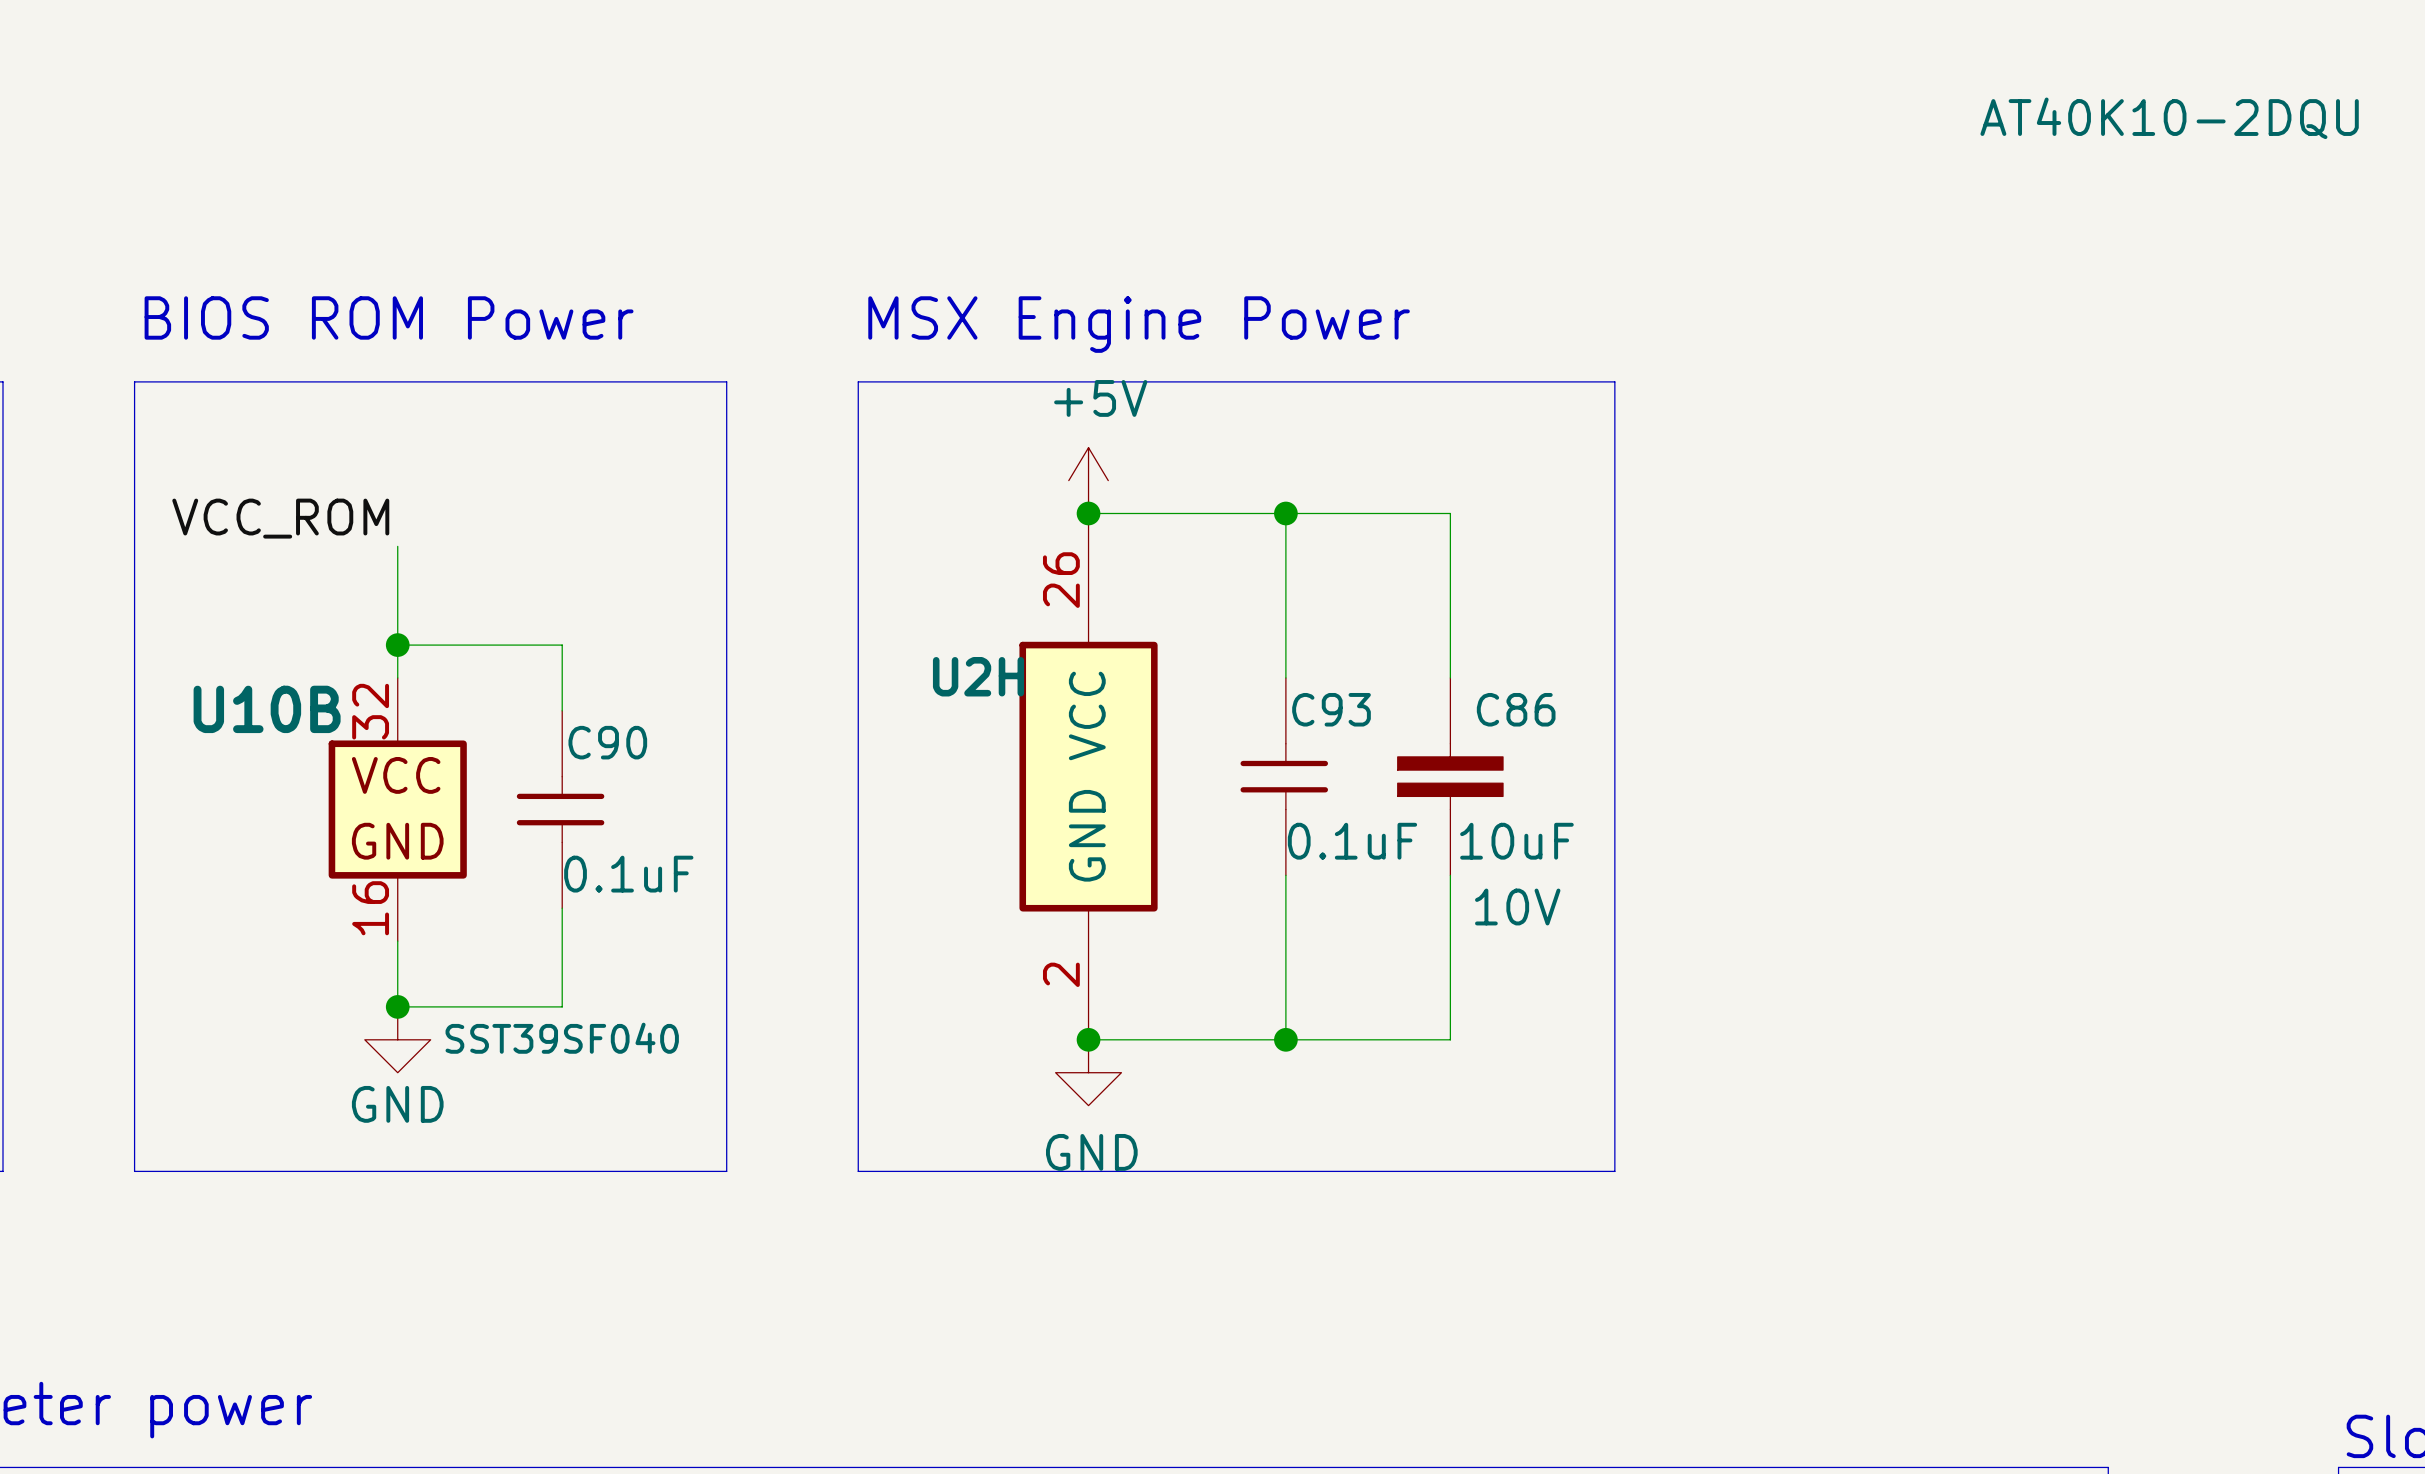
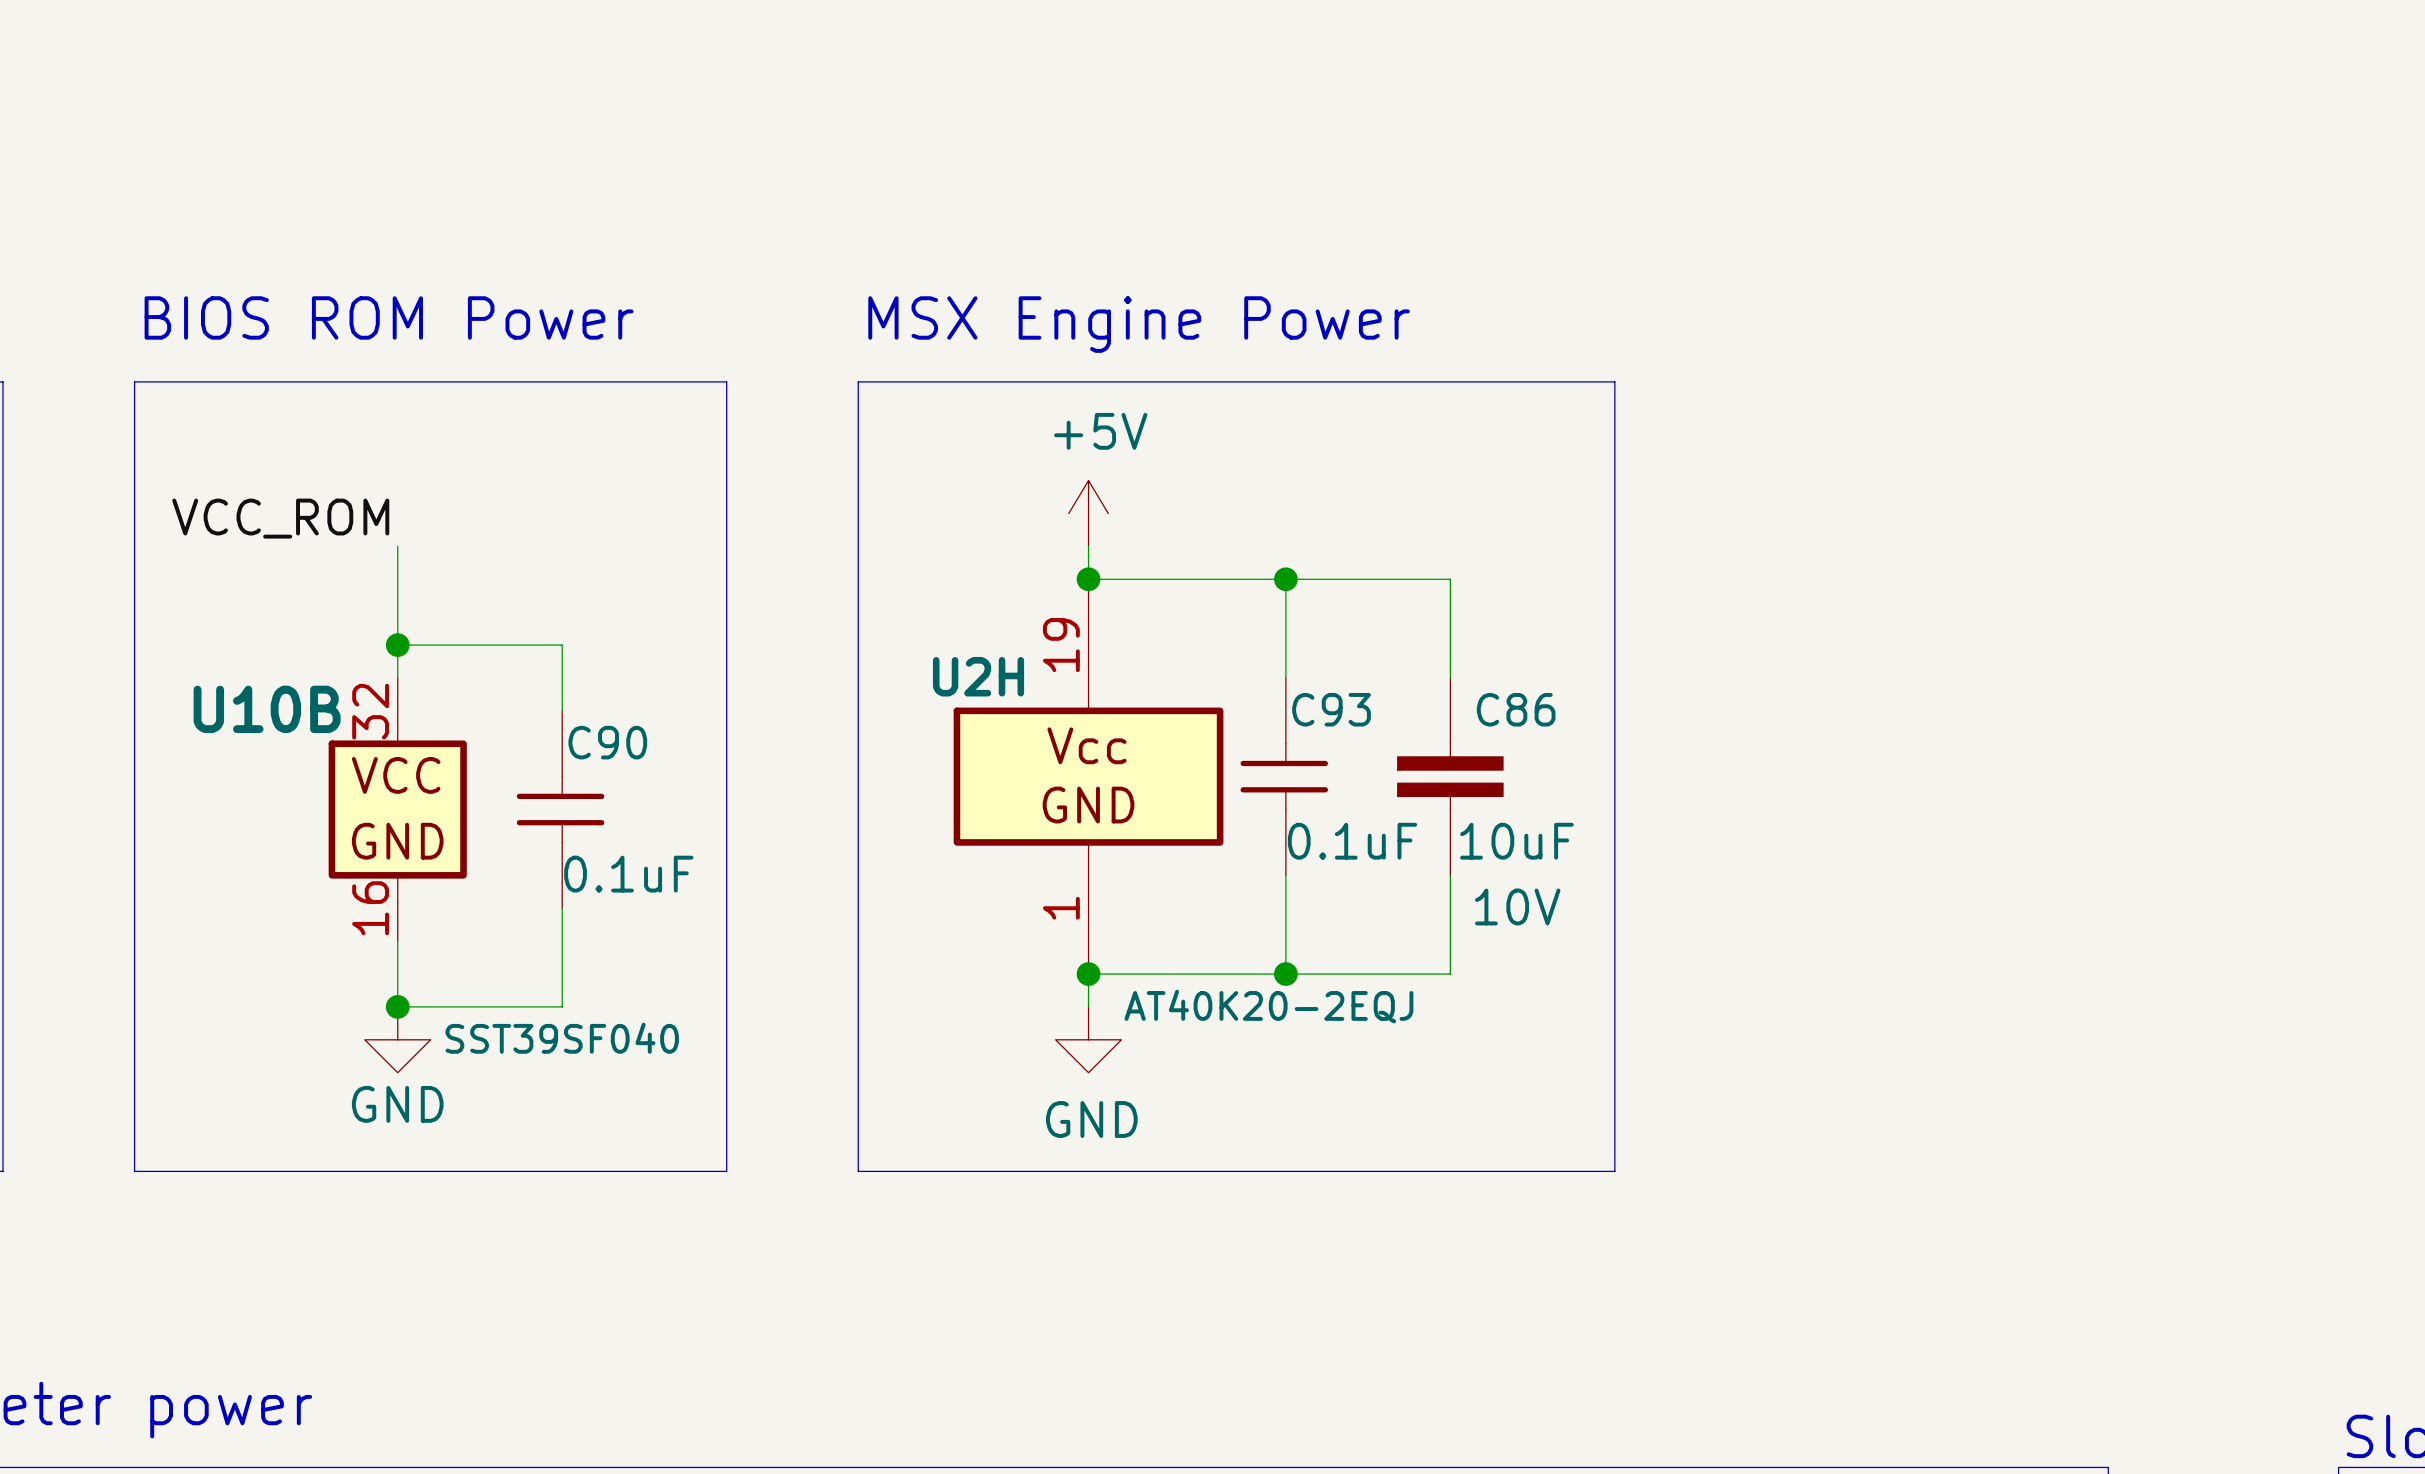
U2H value: AT40K10-2DQU (2169, 118) -> AT40K20-2EQJ (1268, 1006)
power symbol position: +5V (1088, 480) -> +5V (1088, 513)
U2H symbol: [1019, 513, 1158, 1040] -> [953, 579, 1224, 975]
wire: (1088, 513) (1450, 513) (1450, 579) -> (1088, 546) (1088, 579) (1450, 579)
junction position: (1088, 513) -> (1088, 579)
wire: (1285, 513) (1285, 579) -> none
junction position: (1285, 513) -> (1285, 579)
wire: (1285, 974) (1285, 1039) -> none
wire: (1450, 974) (1450, 1039) (1088, 1039) -> (1450, 974) (1088, 974) (1088, 1006)
junction position: (1088, 1039) -> (1088, 974)
junction position: (1285, 1039) -> (1285, 974)
power symbol position: GND (1088, 1072) -> GND (1088, 1039)

